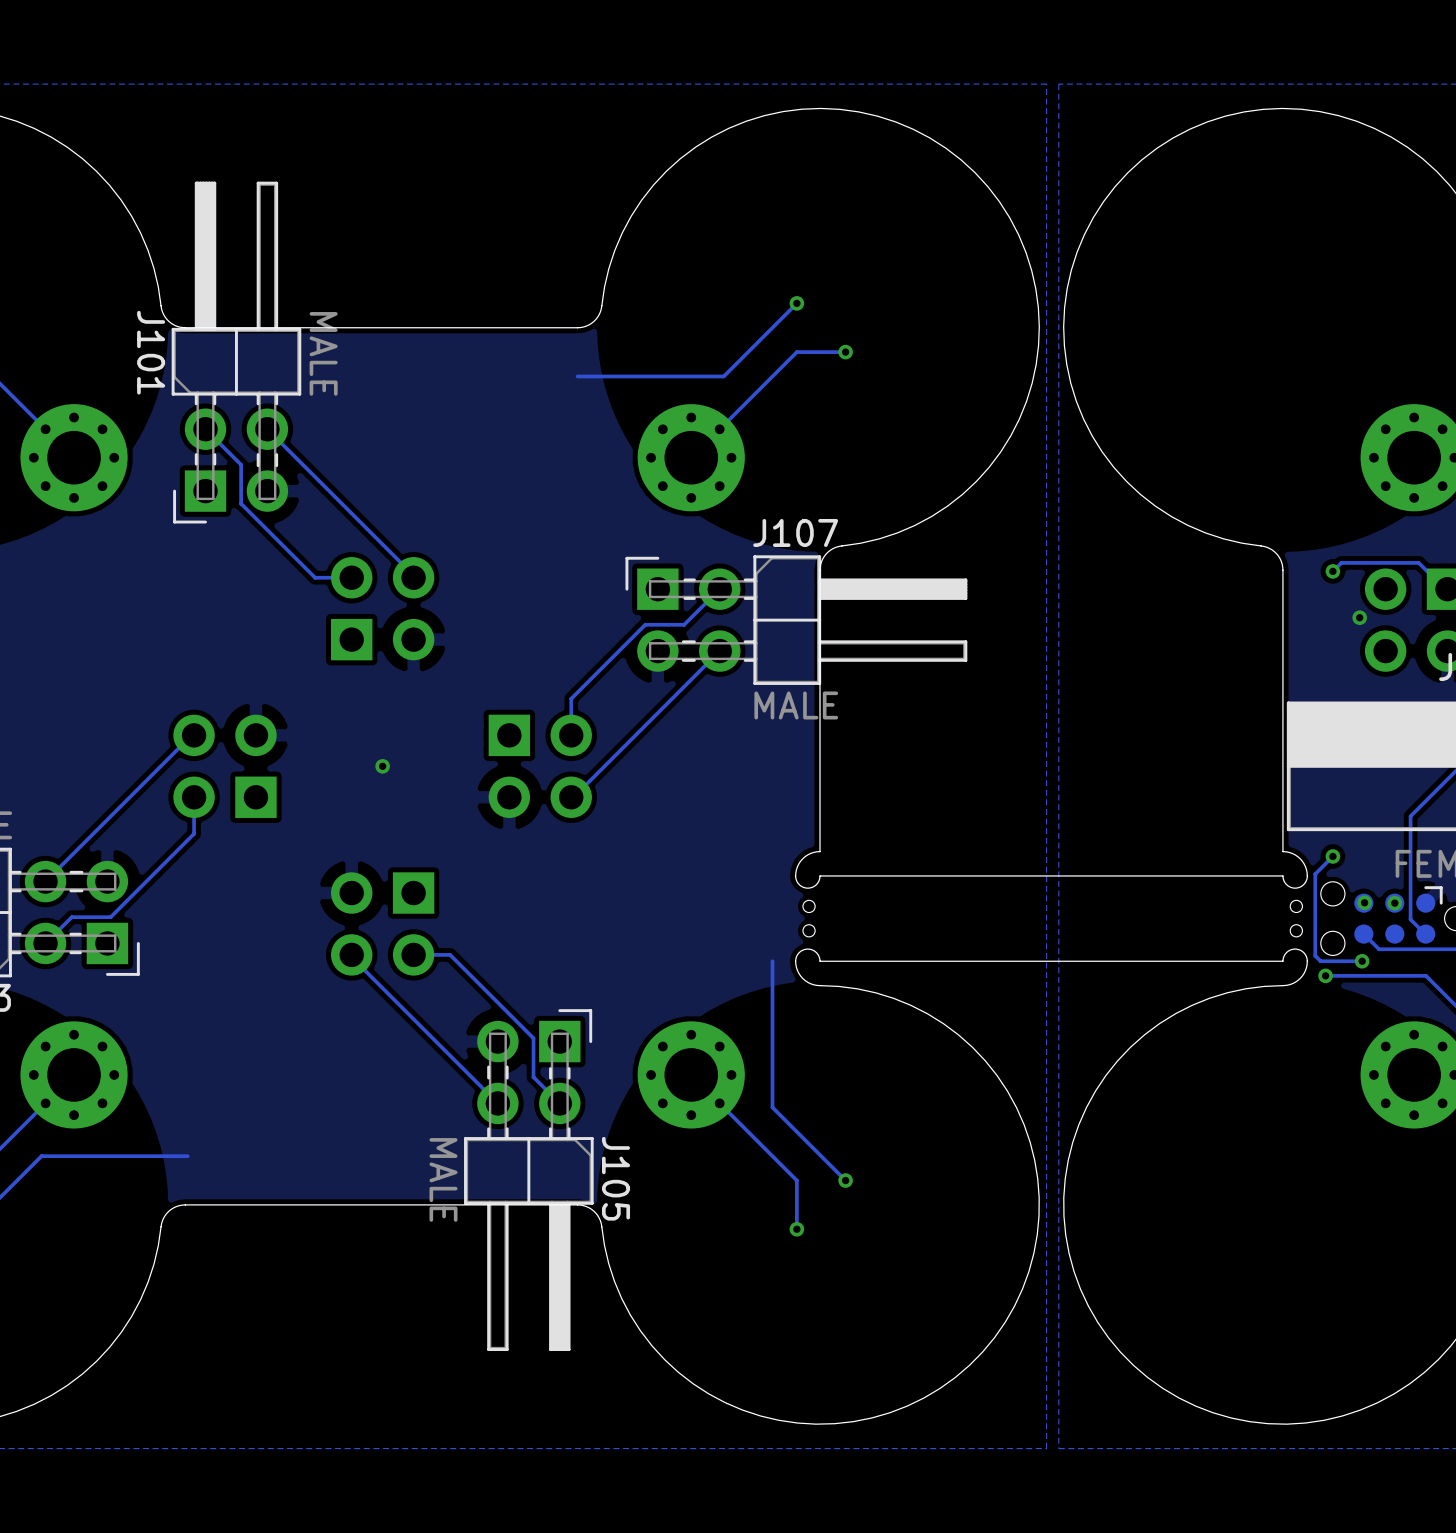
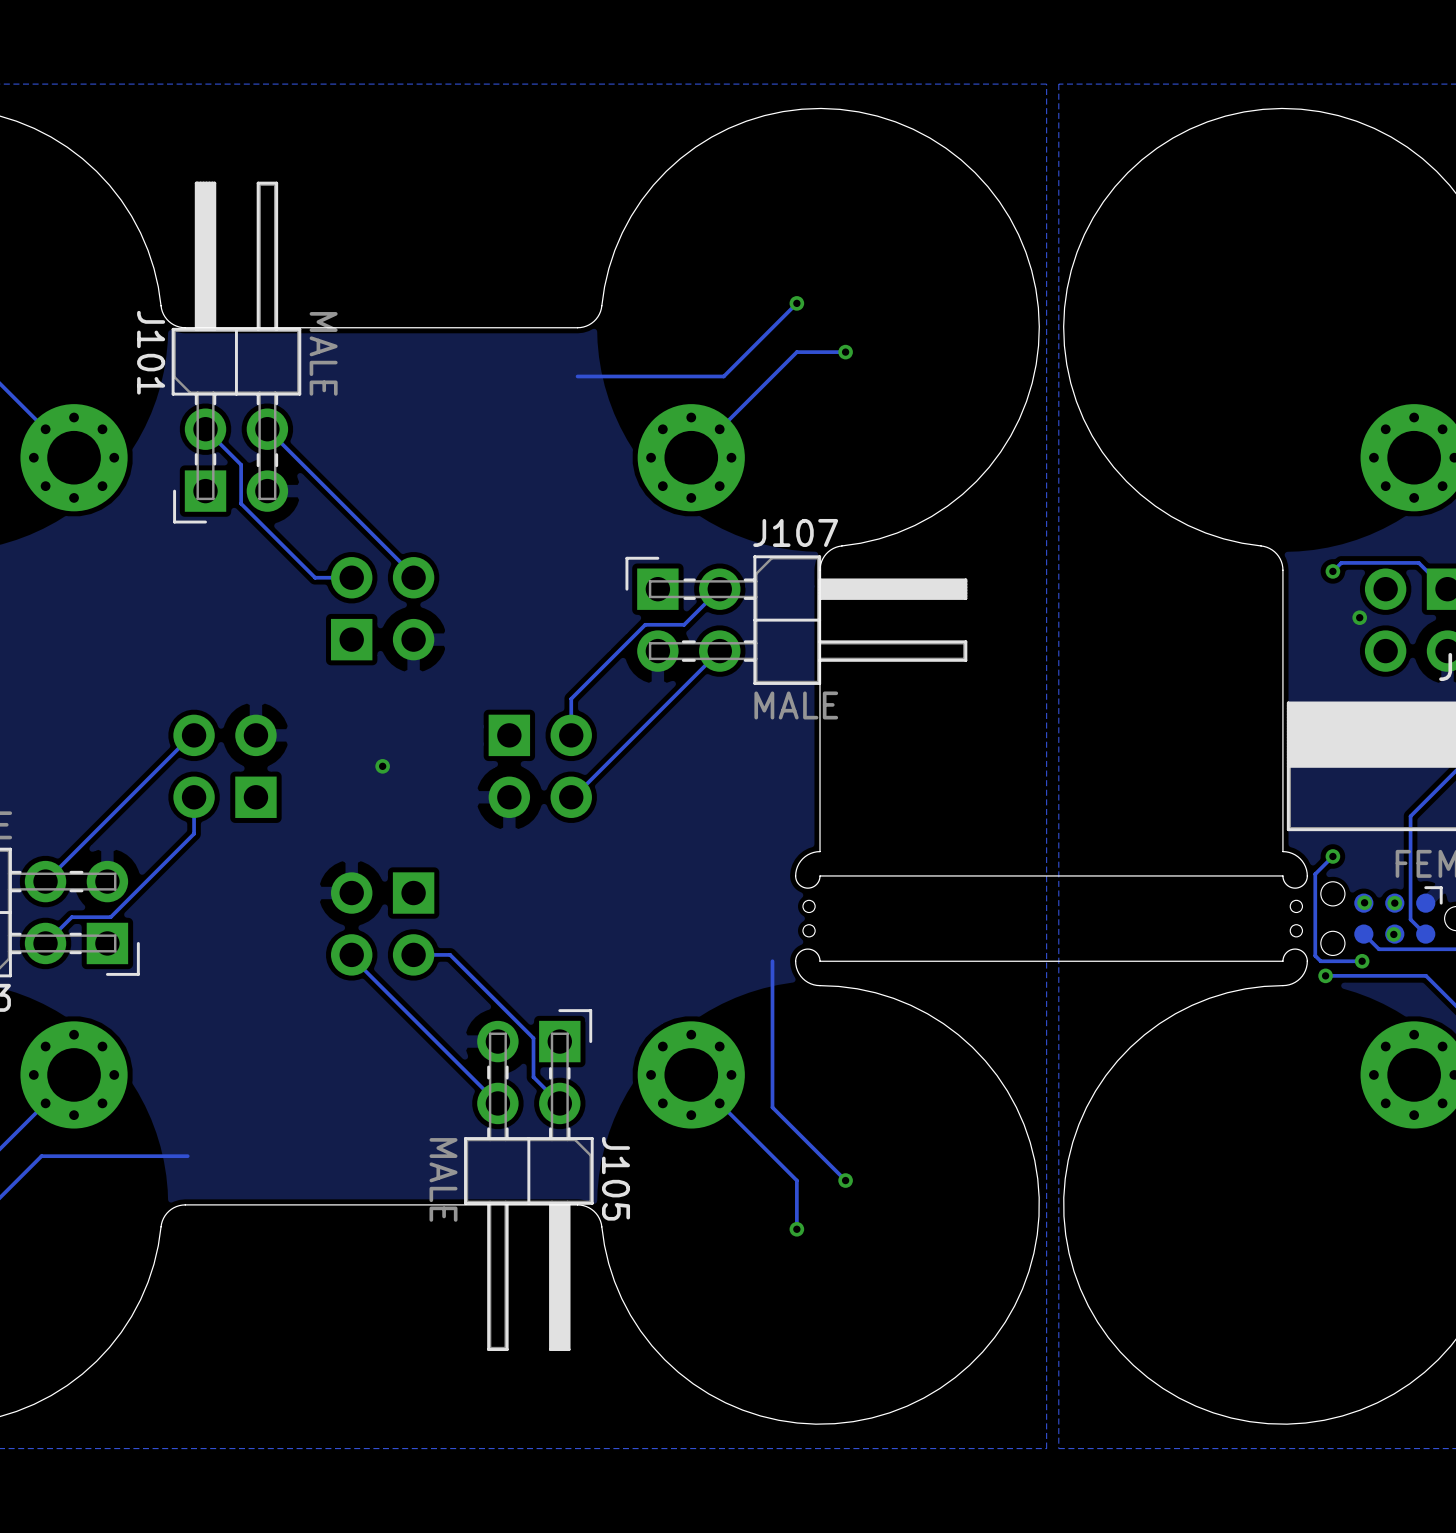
via: none -> (1393, 934)

